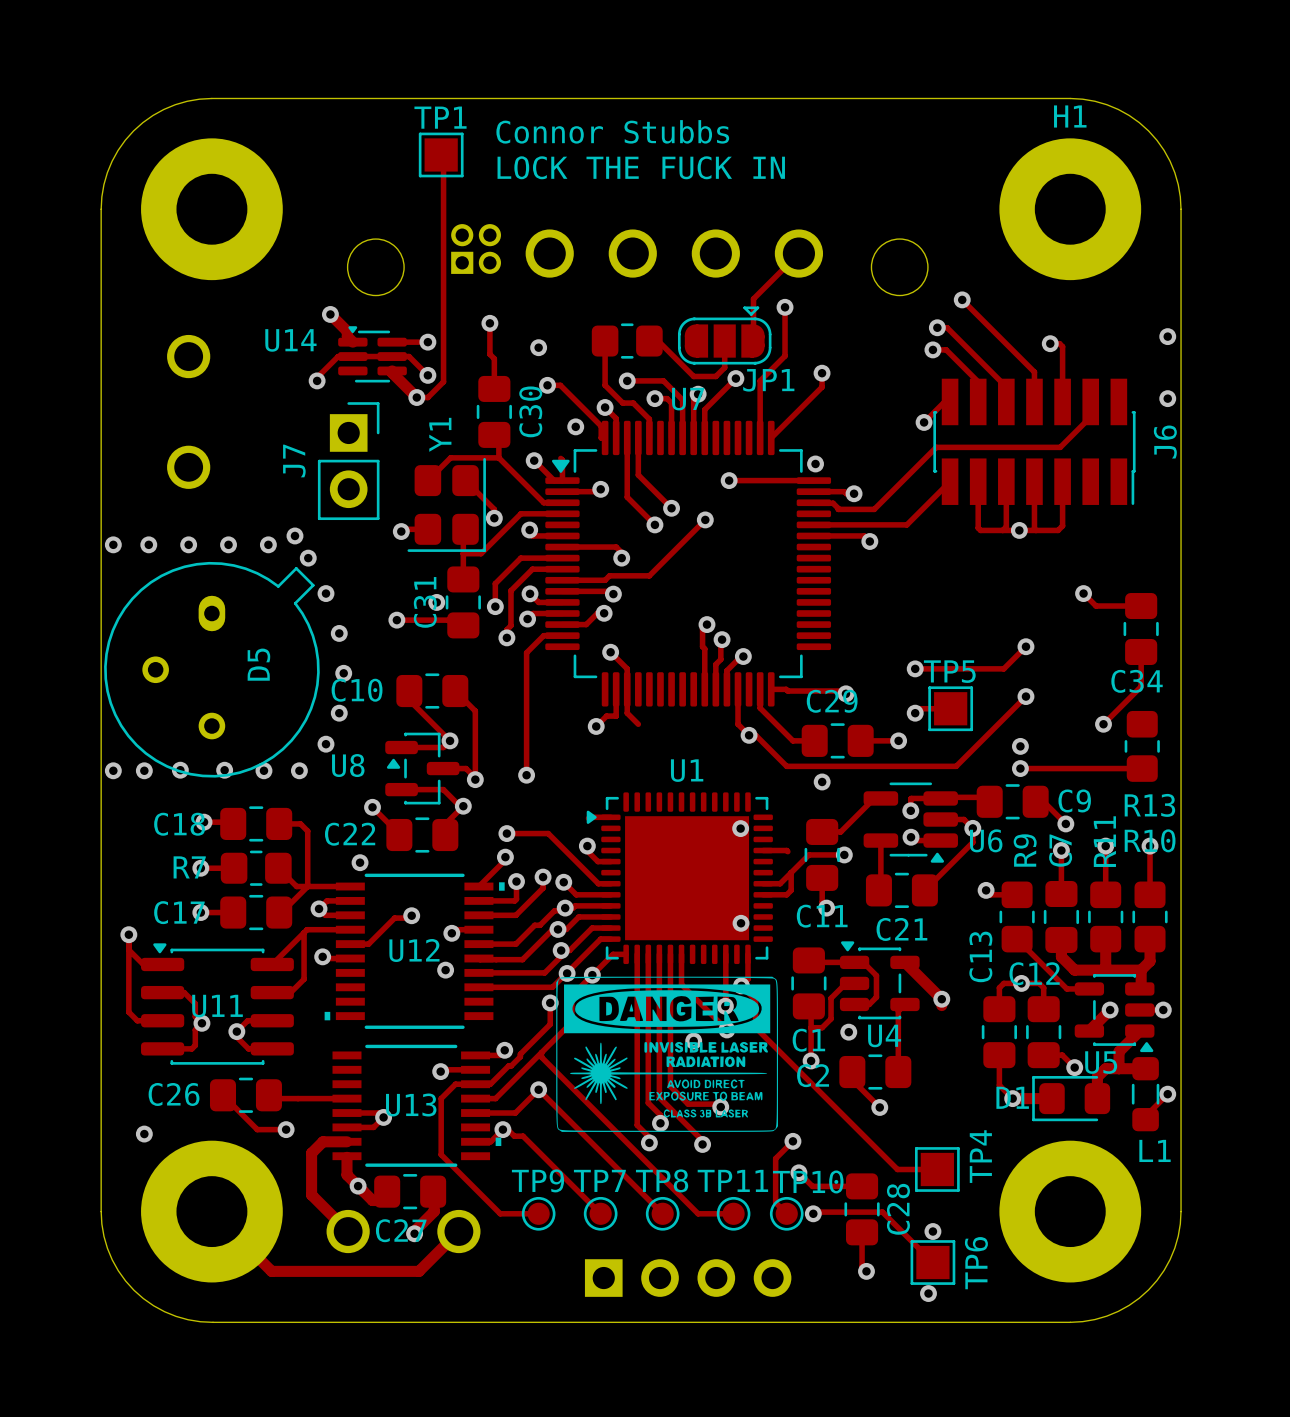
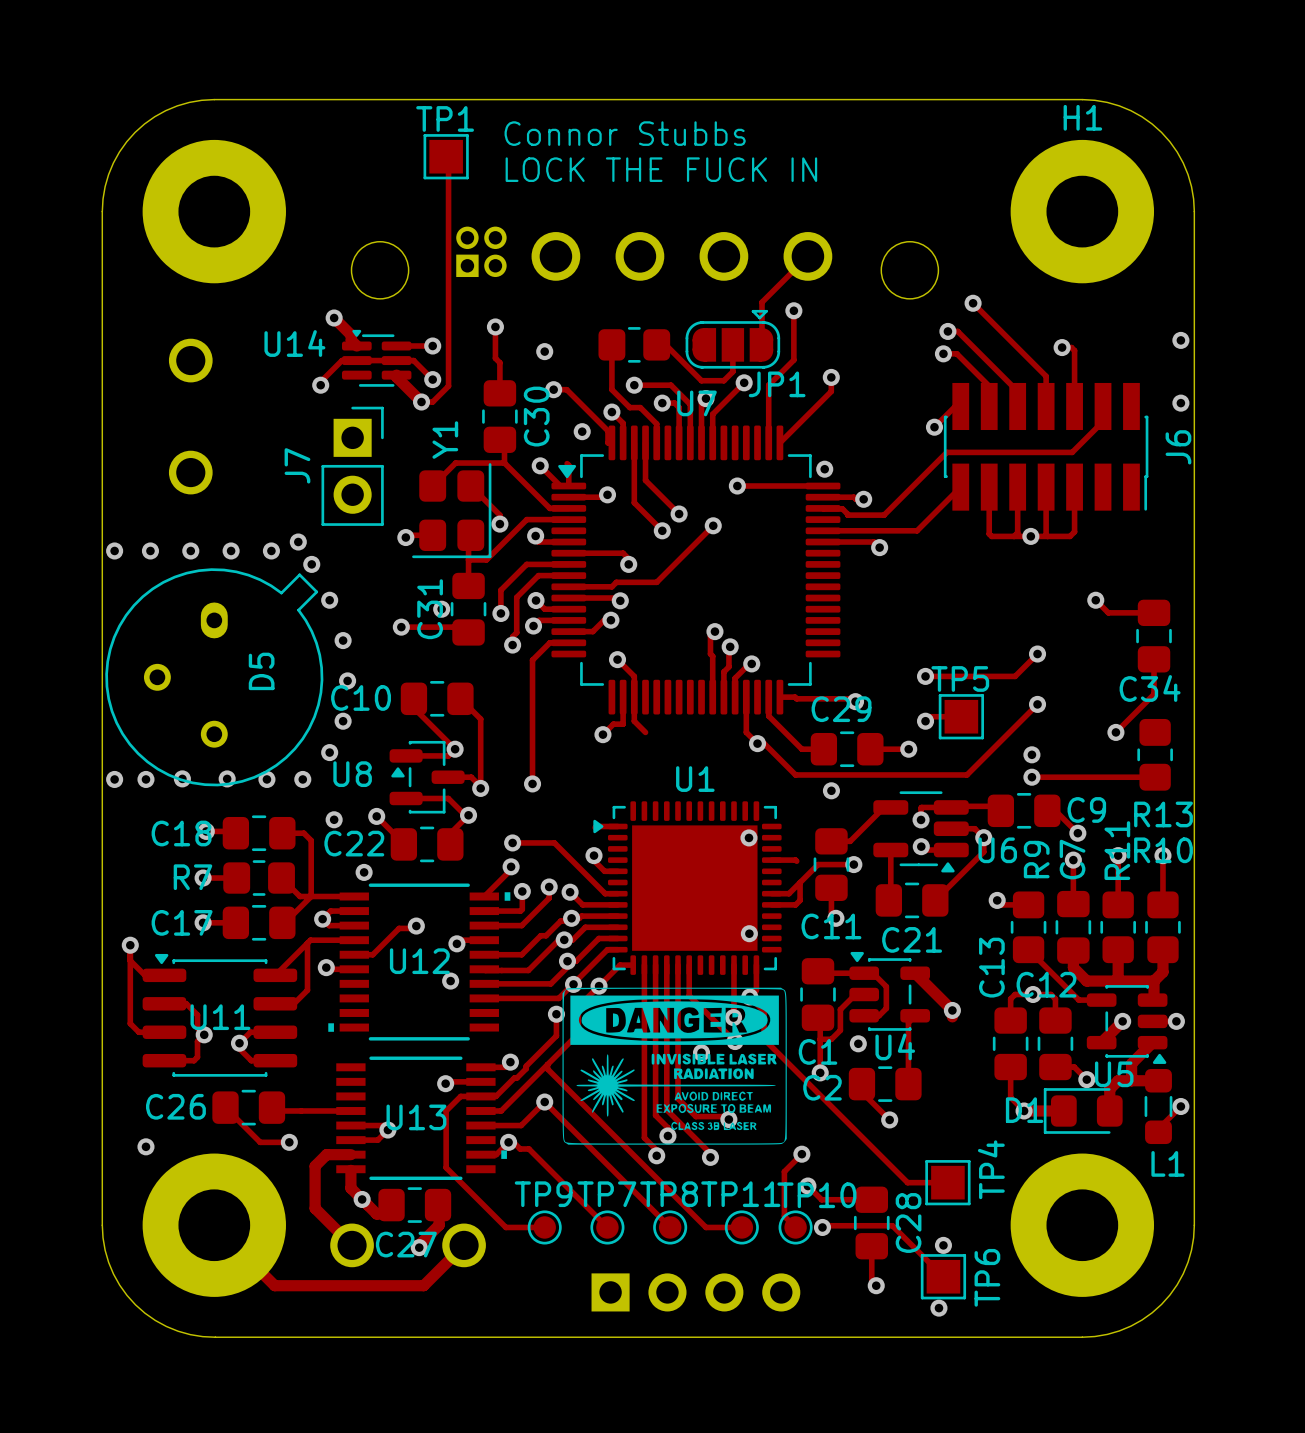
via: none -> (334, 819)

